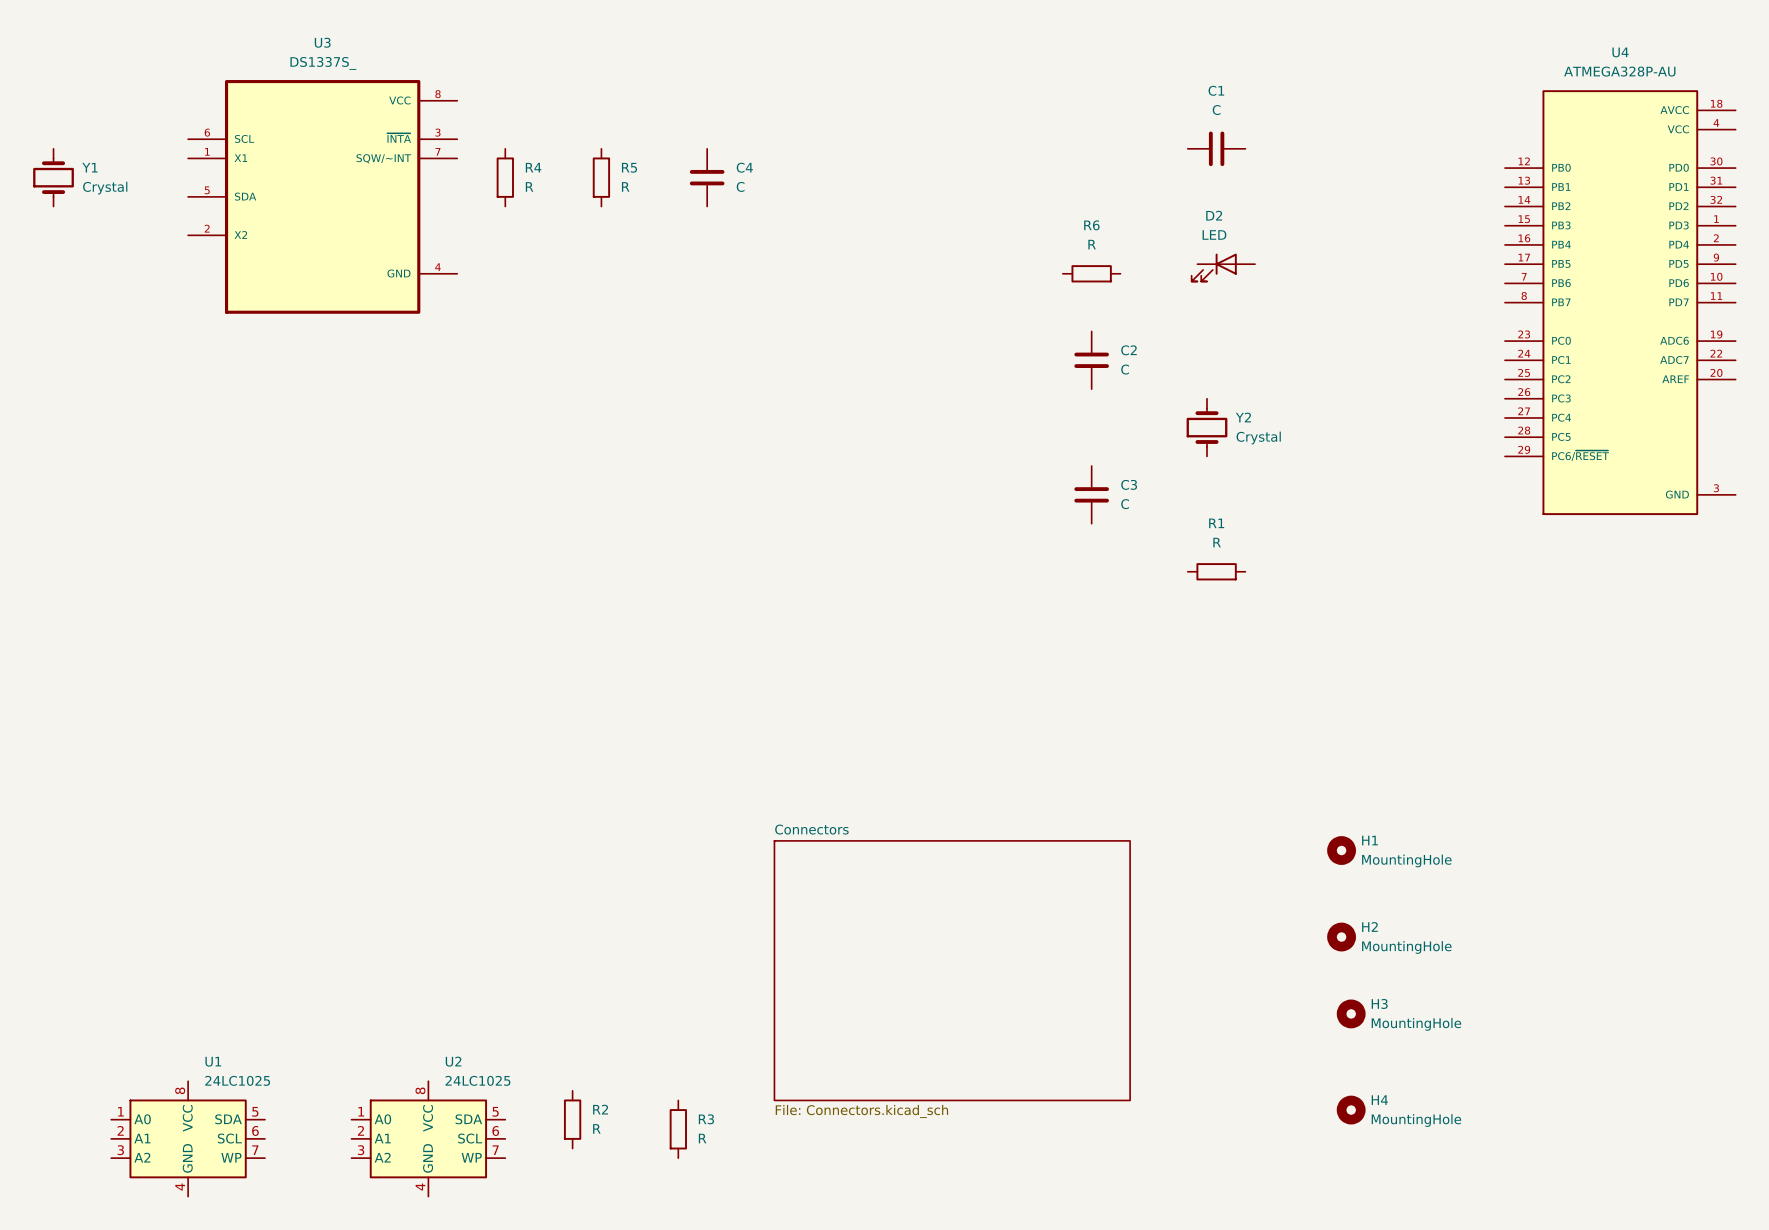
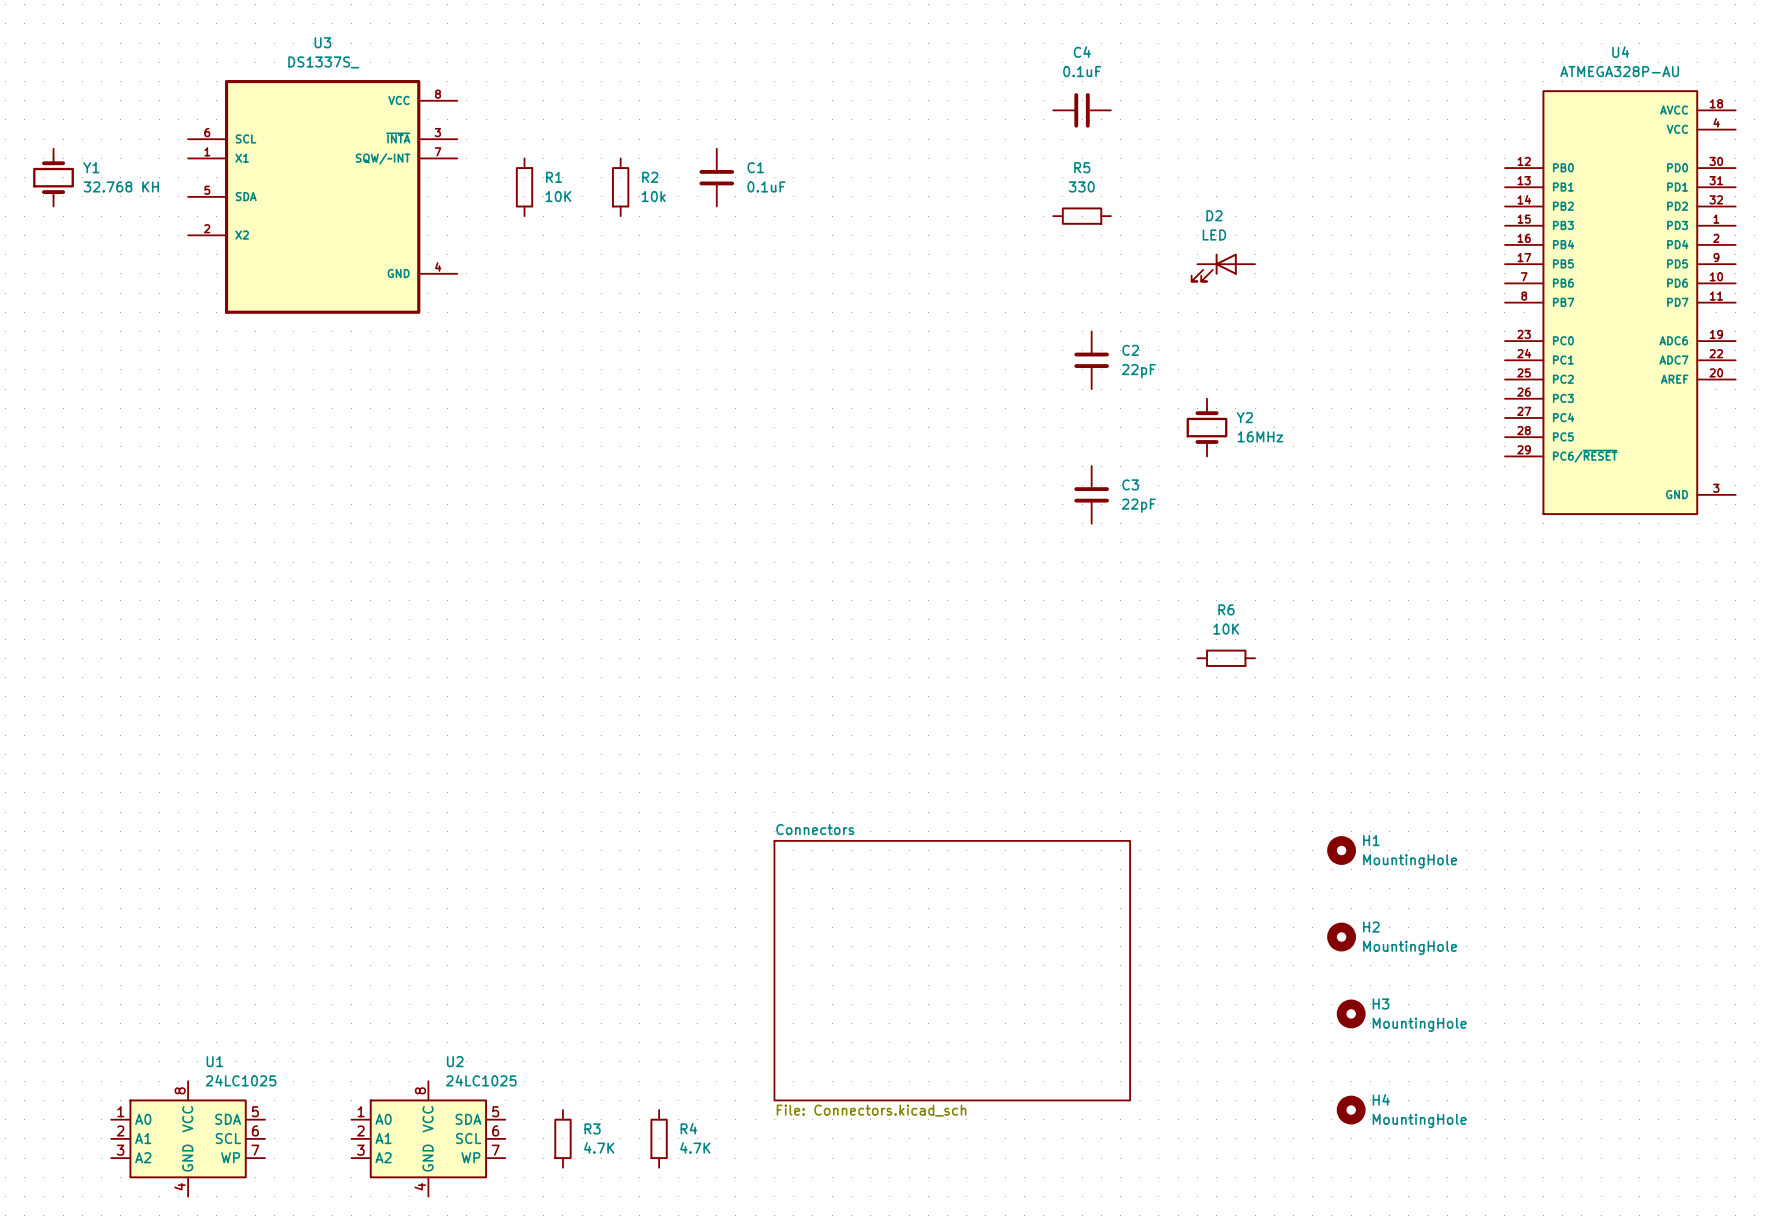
C1 name position: C1 (1216, 90) -> C1 (755, 167)
C1 value: C (1216, 110) -> 0.1uF (766, 186)
C1 rotation: 0° (1216, 148) -> 90° clockwise (716, 177)
C1 position: (1216, 148) -> (716, 177)
R5 name position: R5 (629, 167) -> R5 (1082, 167)
C4 name position: C4 (744, 167) -> C4 (1082, 52)
R4 position: (505, 177) -> (659, 1138)
R5 rotation: 0° (601, 177) -> 90° clockwise (1082, 216)
R5 position: (601, 177) -> (1082, 216)
C4 rotation: 0° (707, 177) -> 90° clockwise (1082, 110)
C4 position: (707, 177) -> (1082, 110)
R4 value: R (529, 186) -> 4.7K (695, 1147)
R5 value: R (625, 186) -> 330 (1081, 186)
C4 value: C (740, 186) -> 0.1uF (1082, 71)
Y1 value: Crystal (105, 188) -> 32.768 KH (121, 186)
R6 value: R (1092, 244) -> 10K (1226, 629)
R6 position: (1091, 273) -> (1226, 658)
C2 value: C (1125, 369) -> 22pF (1138, 371)
Y2 value: Crystal (1258, 438) -> 16MHz (1260, 436)
C3 value: C (1125, 504) -> 22pF (1138, 505)
R1 name position: R1 (1216, 523) -> R1 (554, 177)
R1 value: R (1217, 542) -> 10K (558, 196)
R1 rotation: 0° (1216, 571) -> 90° clockwise (524, 187)
R1 position: (1216, 571) -> (524, 187)
R2 position: (572, 1119) -> (620, 187)
R2 value: R (596, 1128) -> 10k (653, 196)
R3 position: (678, 1129) -> (562, 1138)
R3 value: R (702, 1138) -> 4.7K (599, 1147)

